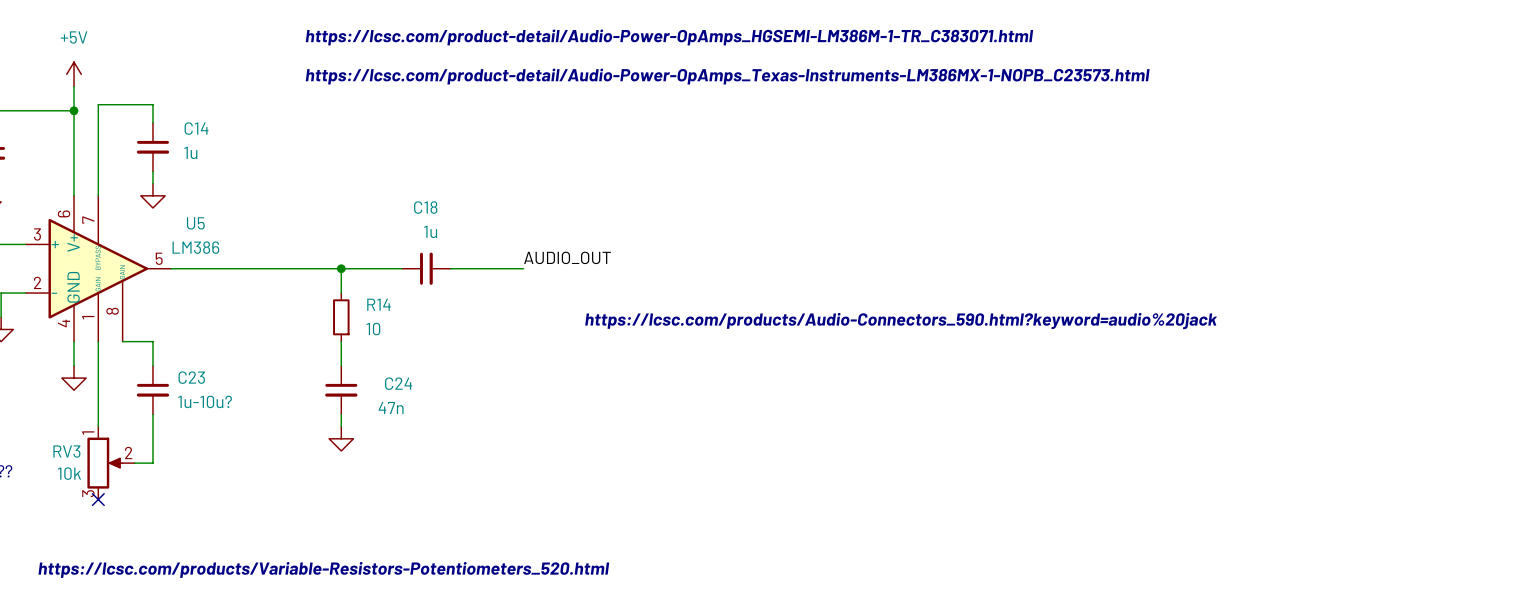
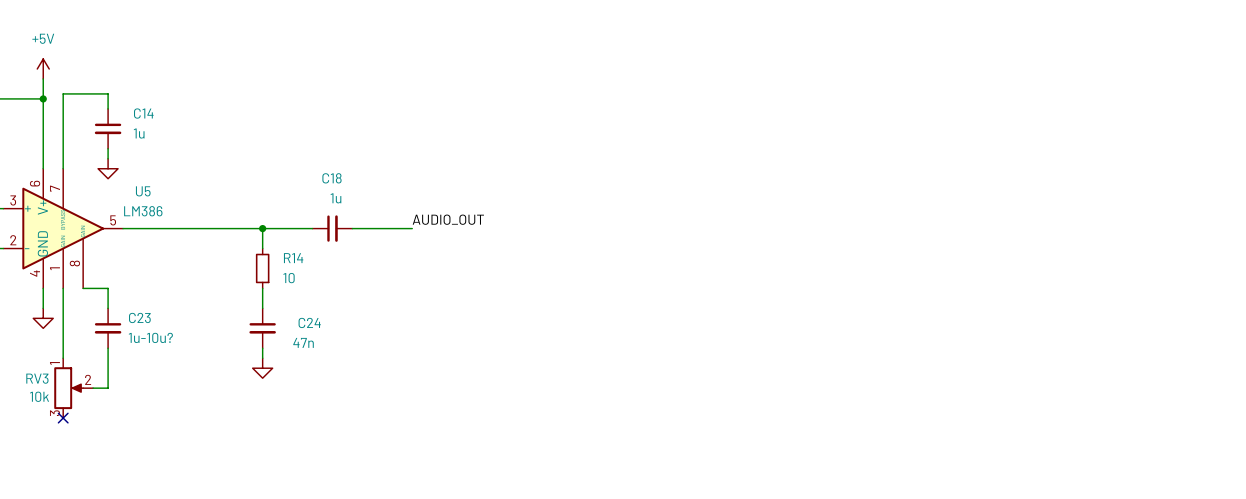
text: https://lcsc.com/product-detail/Audio-Power-OpAmps_HGSEMI-LM386M-1-TR_C383071.html (669, 37) -> none
text: https://lcsc.com/product-detail/Audio-Power-OpAmps_Texas-Instruments-LM386MX-1-NOPB_C23573.html (727, 76) -> none
text: https://lcsc.com/products/Audio-Connectors_590.html?keyword=audio%20jack (901, 321) -> none
text: https://lcsc.com/products/Variable-Resistors-Potentiometers_520.html (323, 569) -> none

